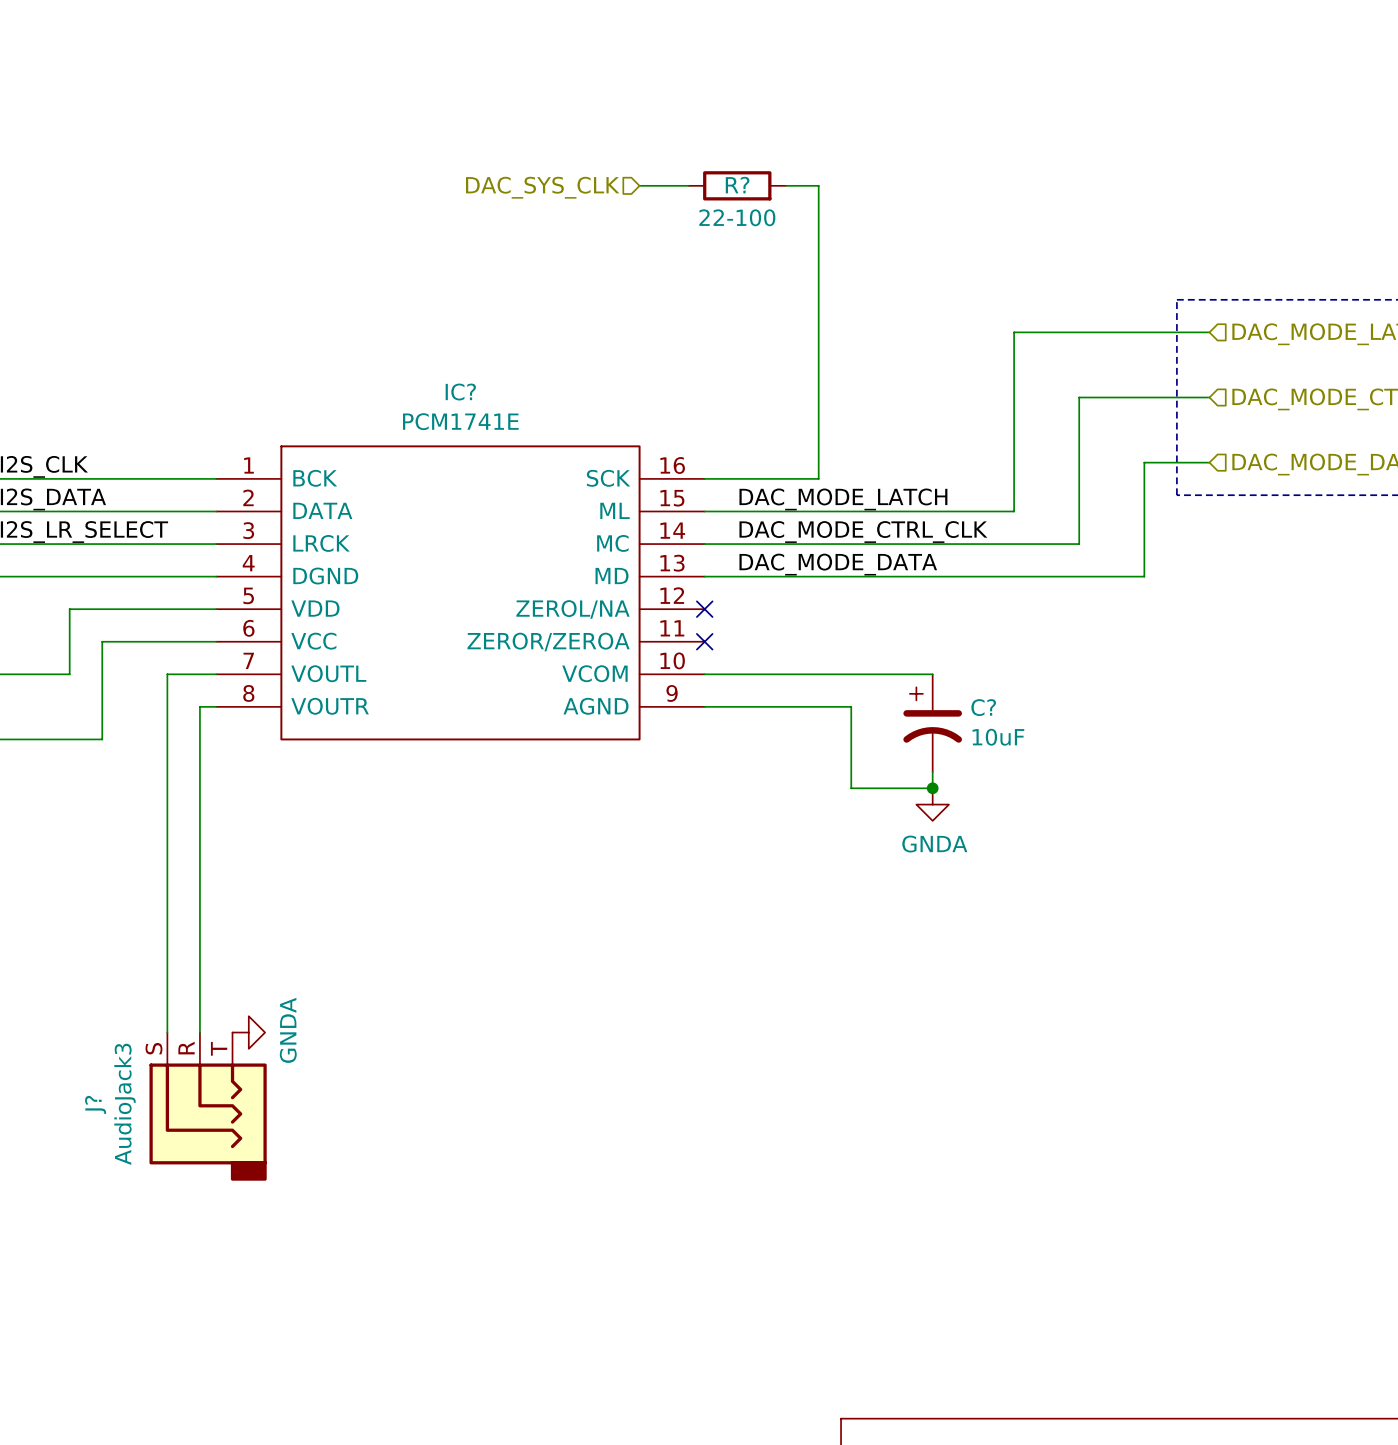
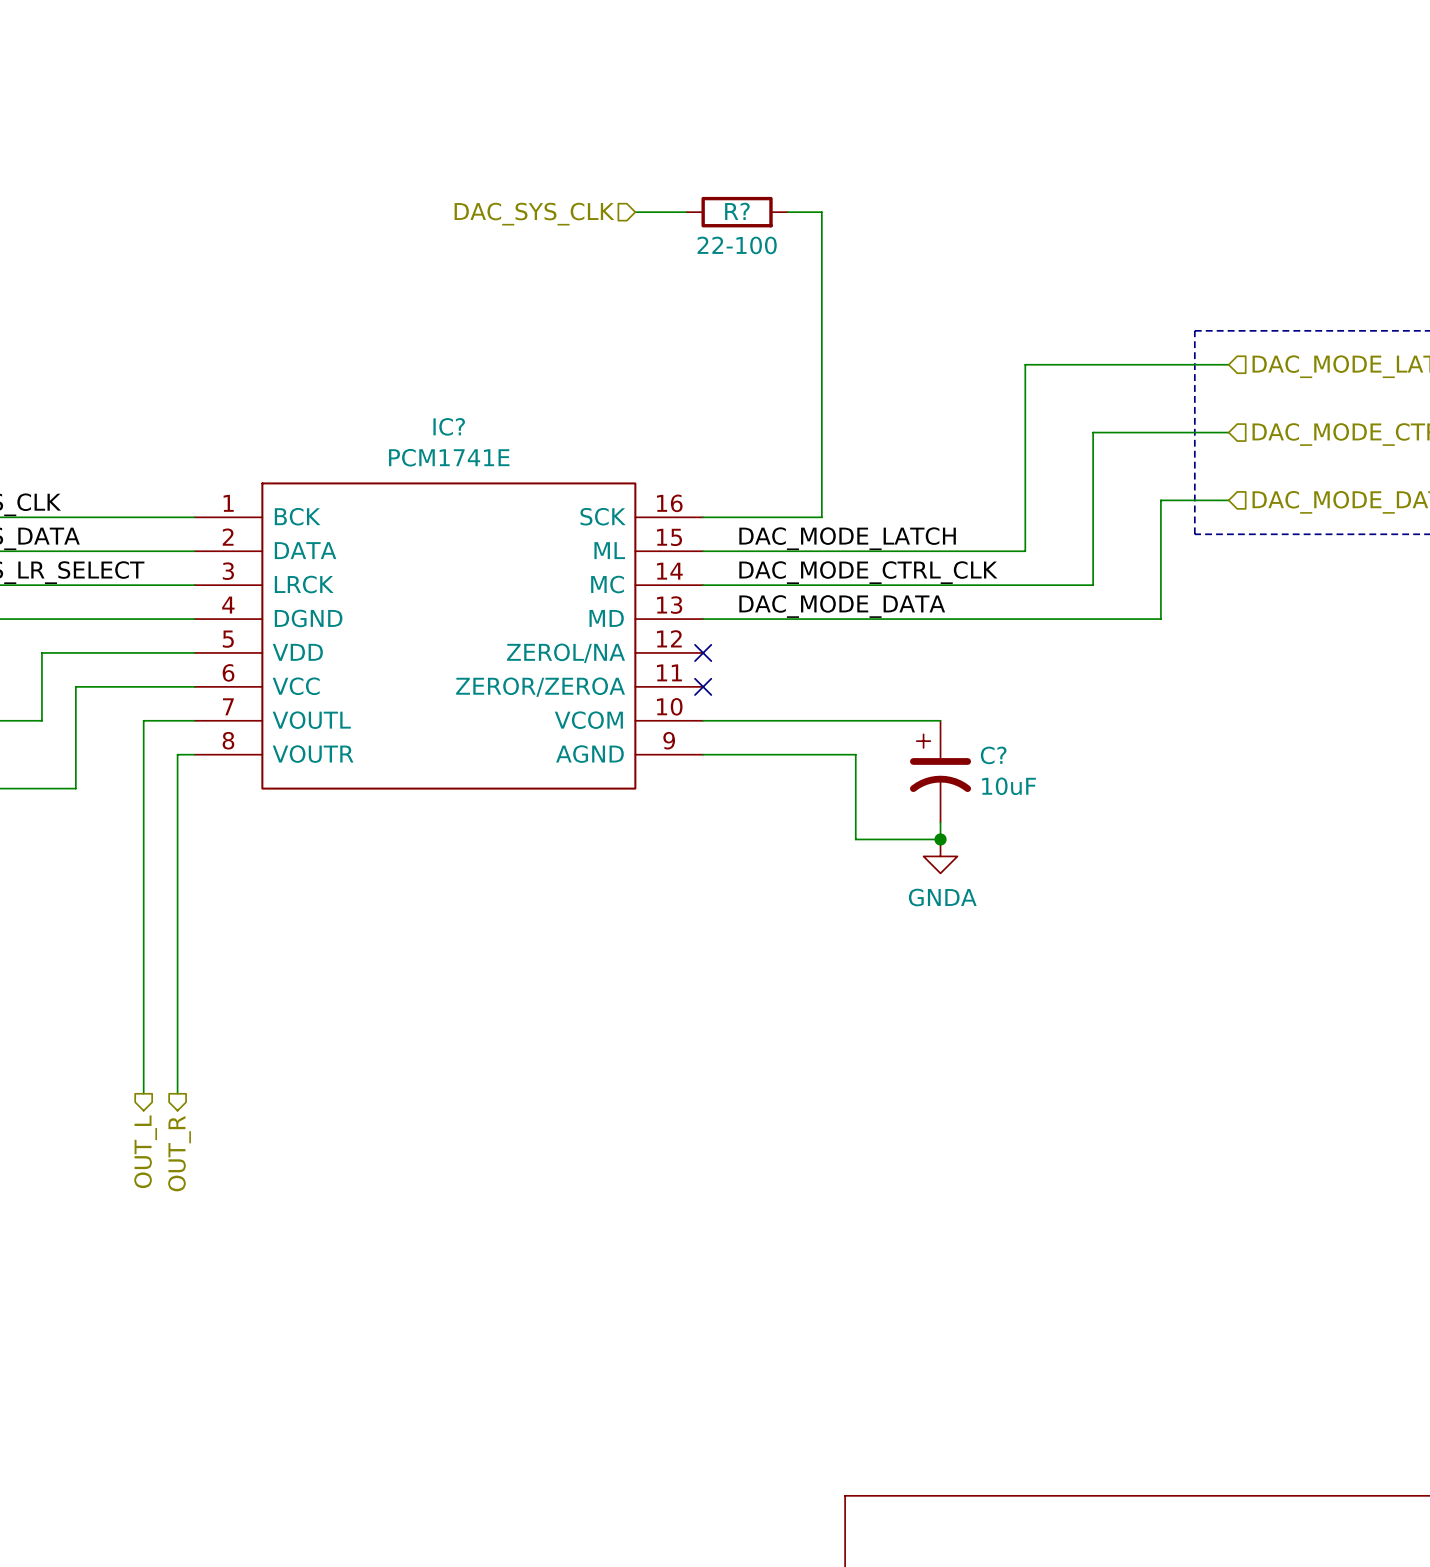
power symbol: GNDA (248, 1032) -> none
hierarchical label: none -> OUT_L (145, 1151)
hierarchical label: none -> OUT_R (179, 1153)
J?: AudioJack3 (208, 1106) -> none

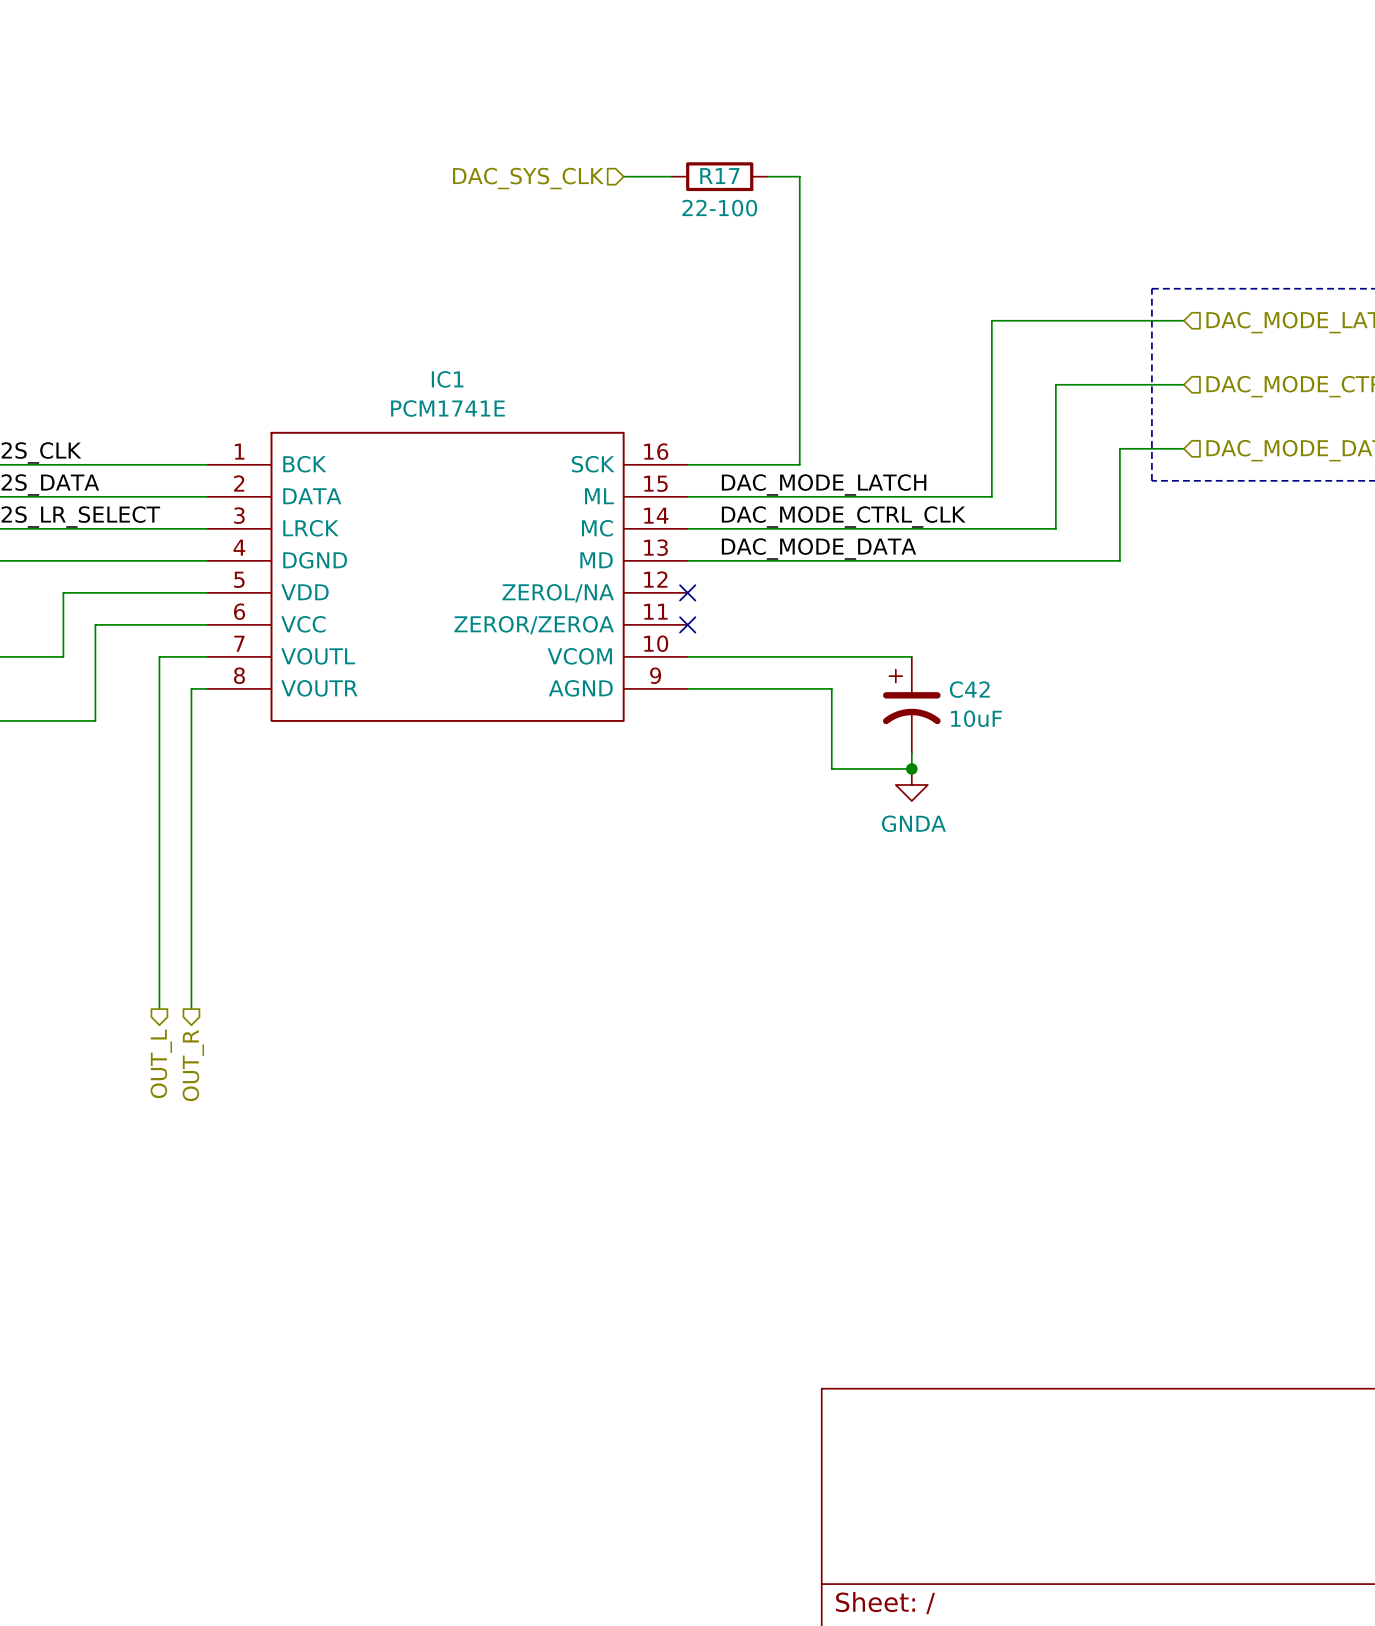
R? name: R? (737, 211) -> R17 (719, 176)
IC? name: IC? (449, 426) -> IC1 (447, 379)
C? name: C? (993, 755) -> C42 (969, 689)

